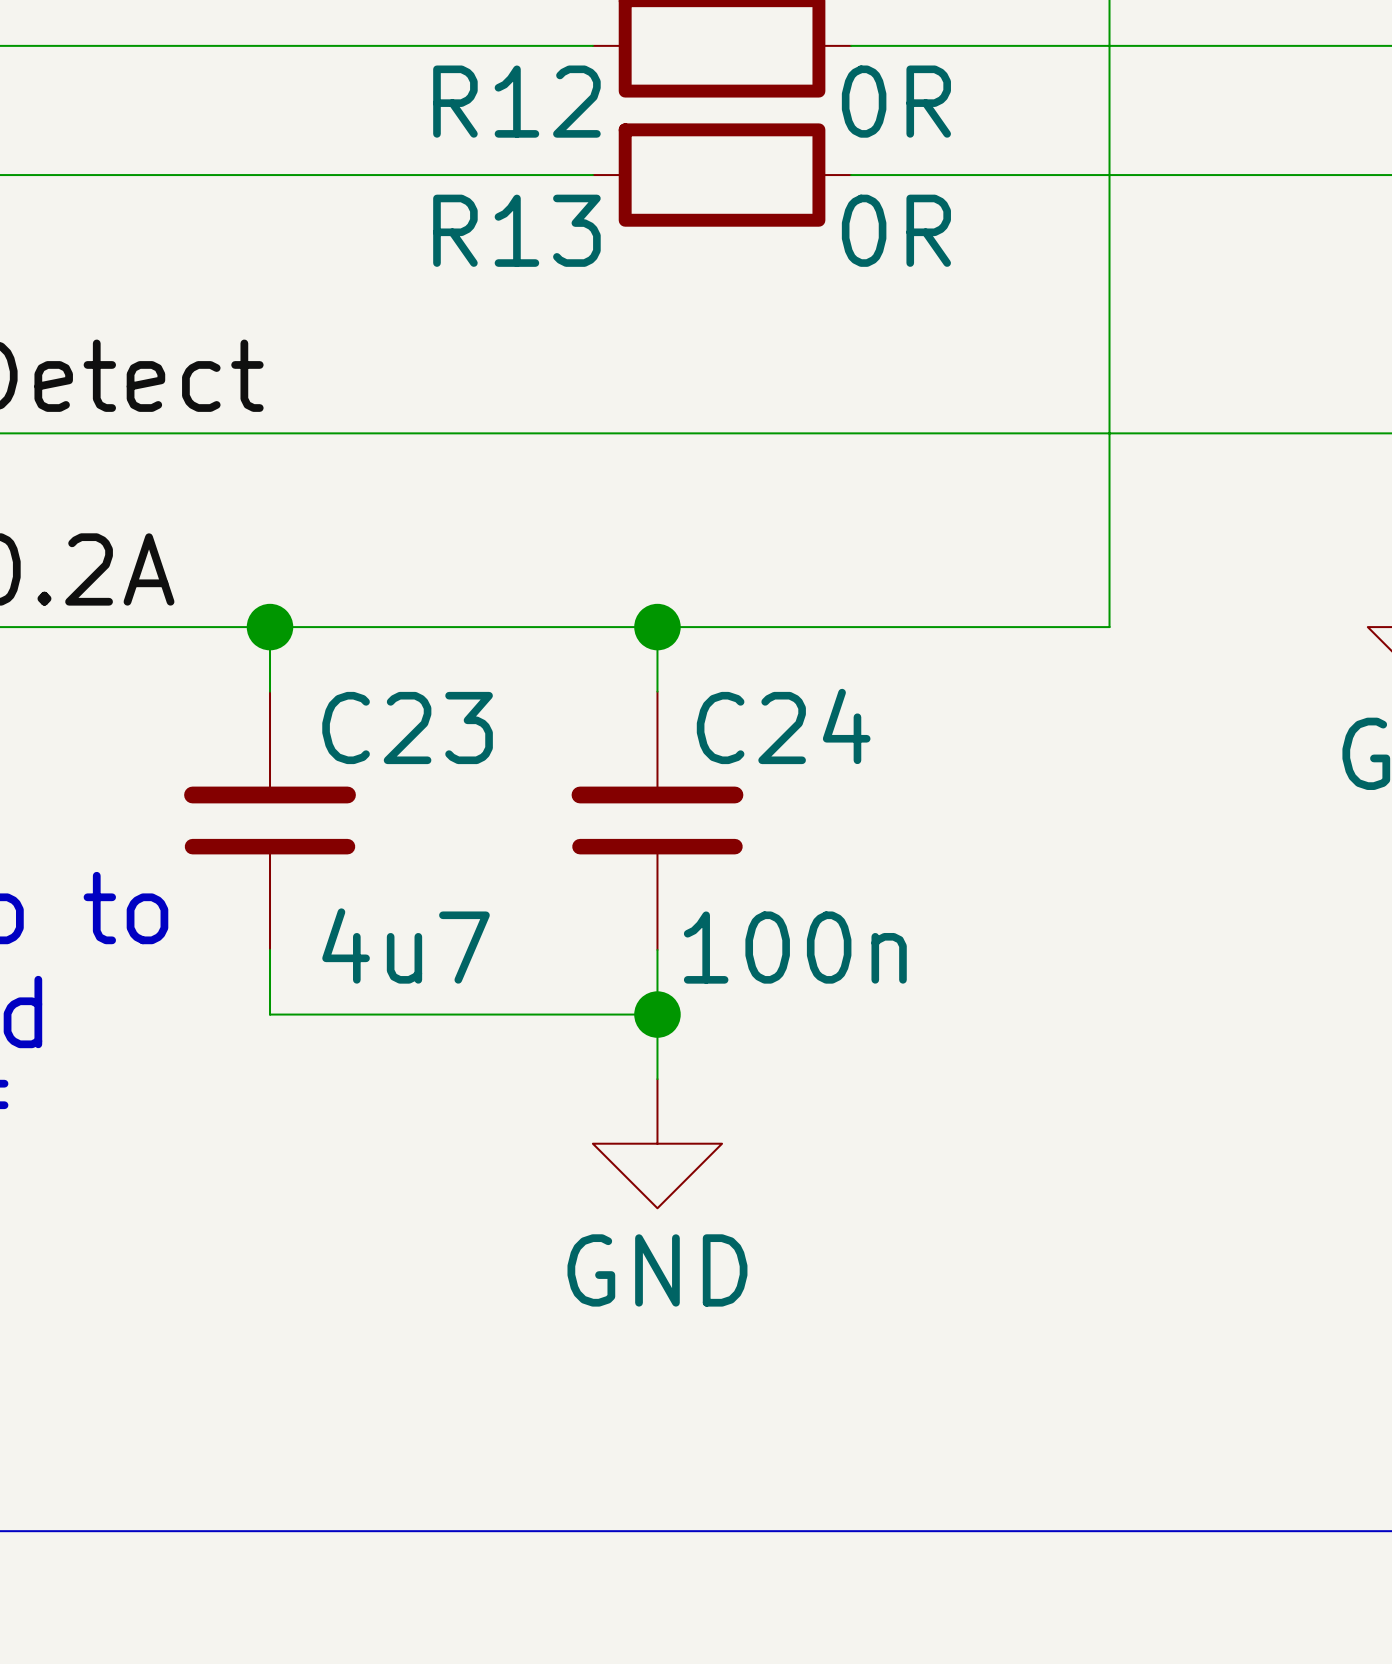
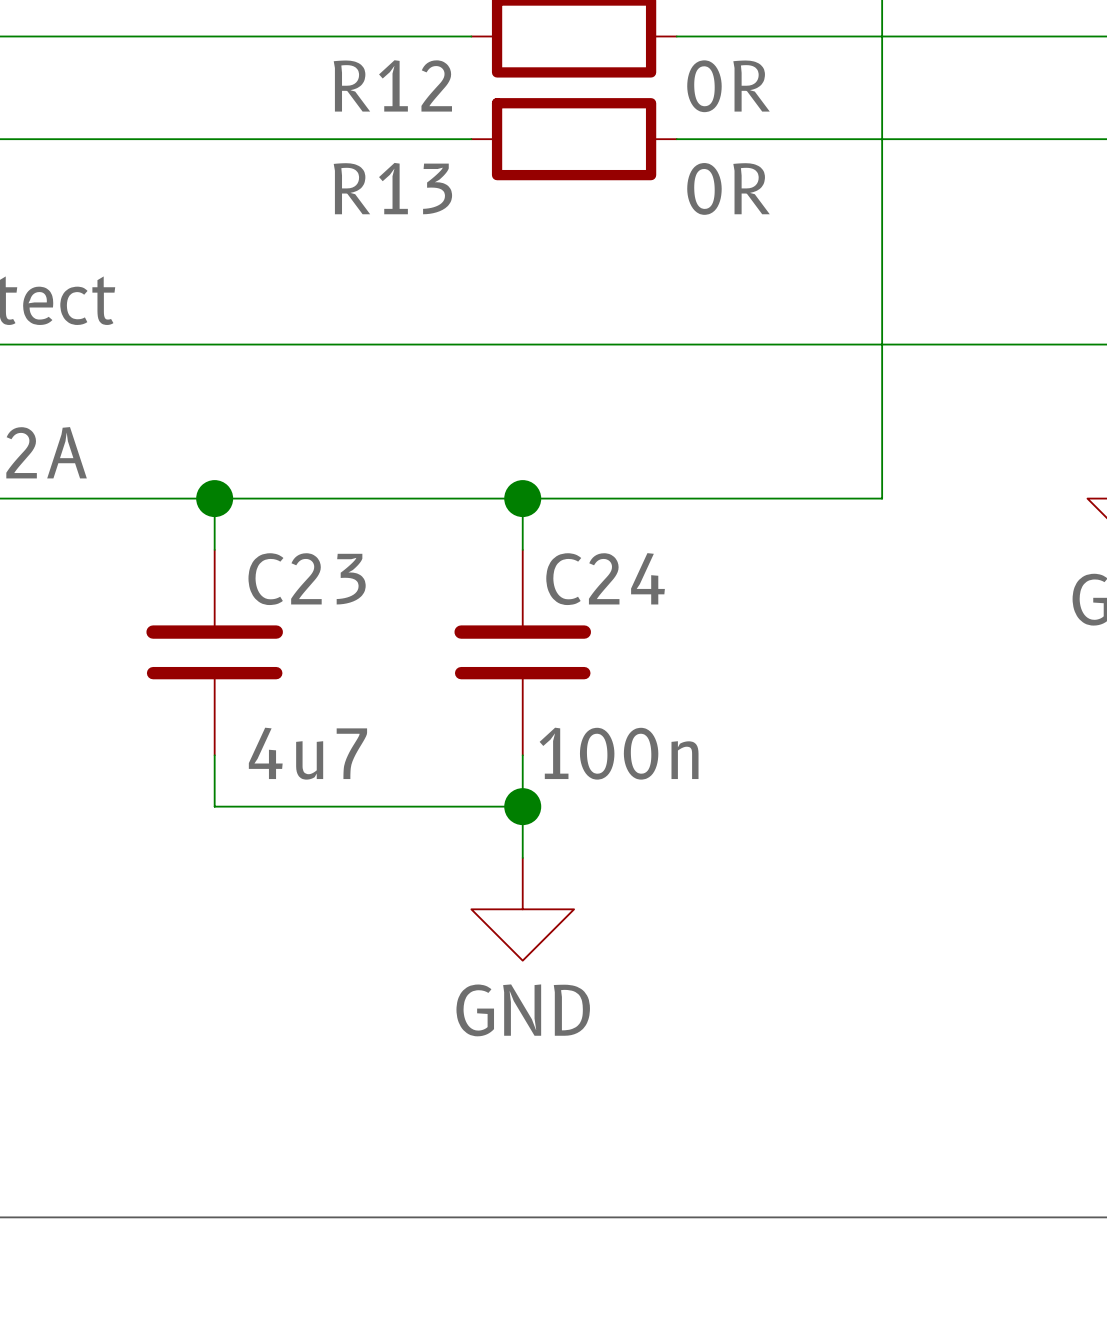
R12 name position: R12 (516, 101) -> R12 (392, 85)
R12 text position: 0R (896, 101) -> 0R (728, 86)
R13 name position: R13 (516, 230) -> R13 (392, 188)
R13 text position: 0R (896, 230) -> 0R (728, 188)

